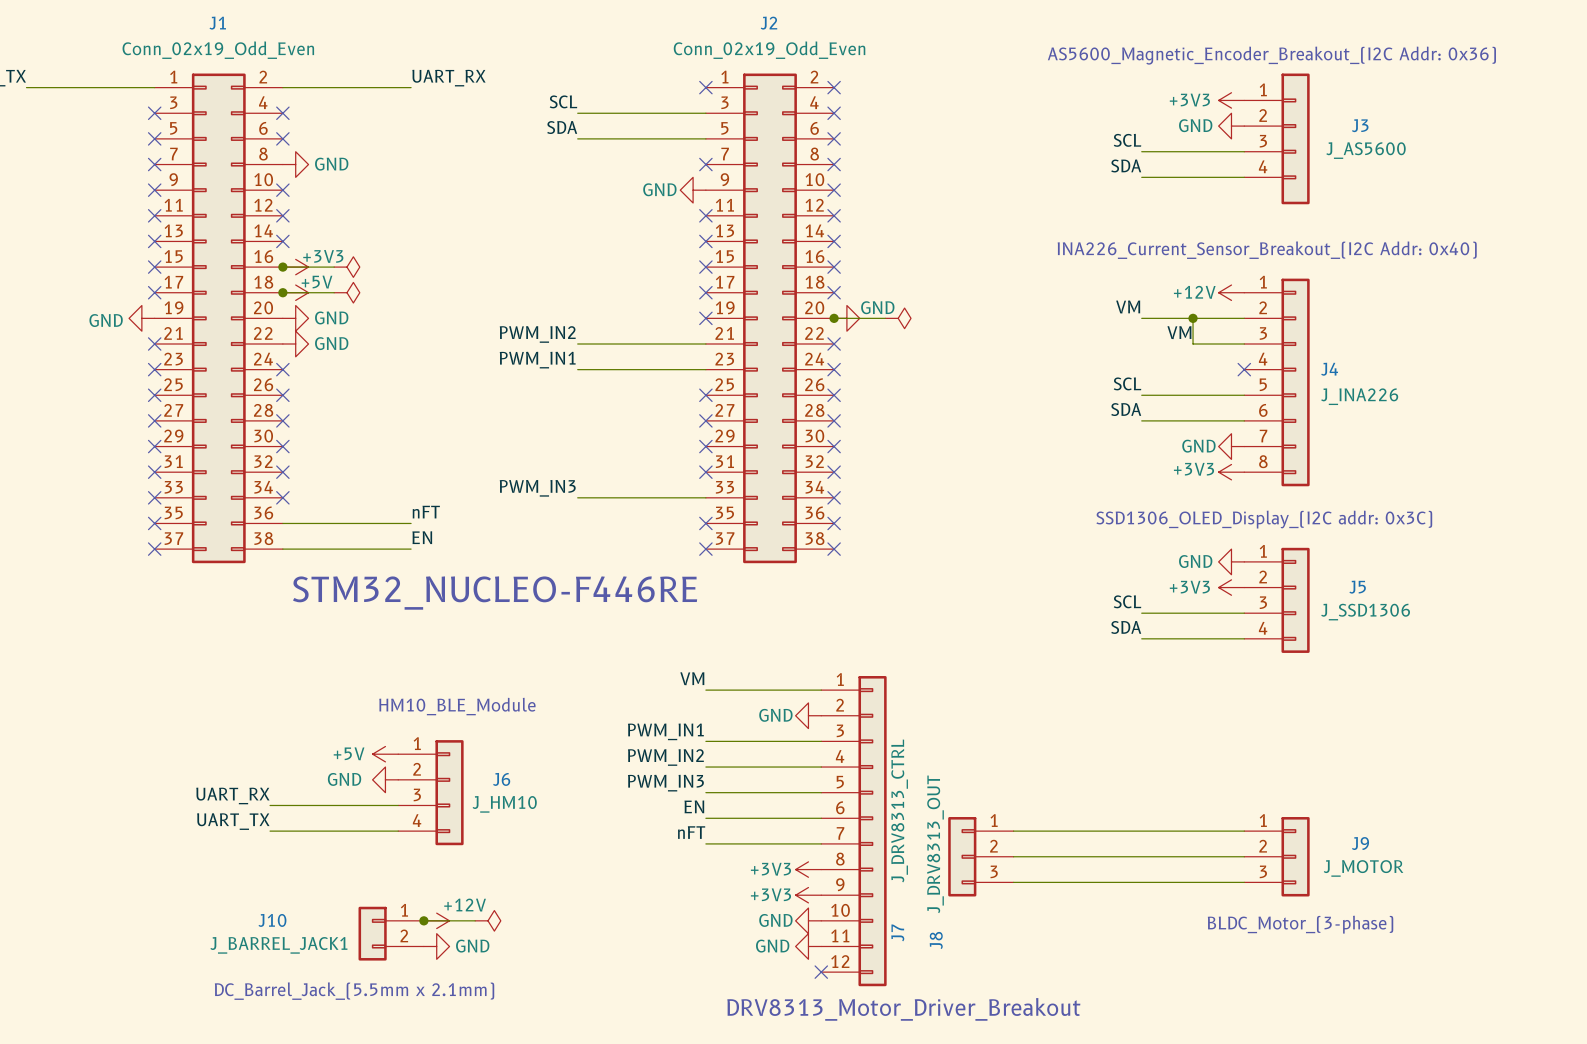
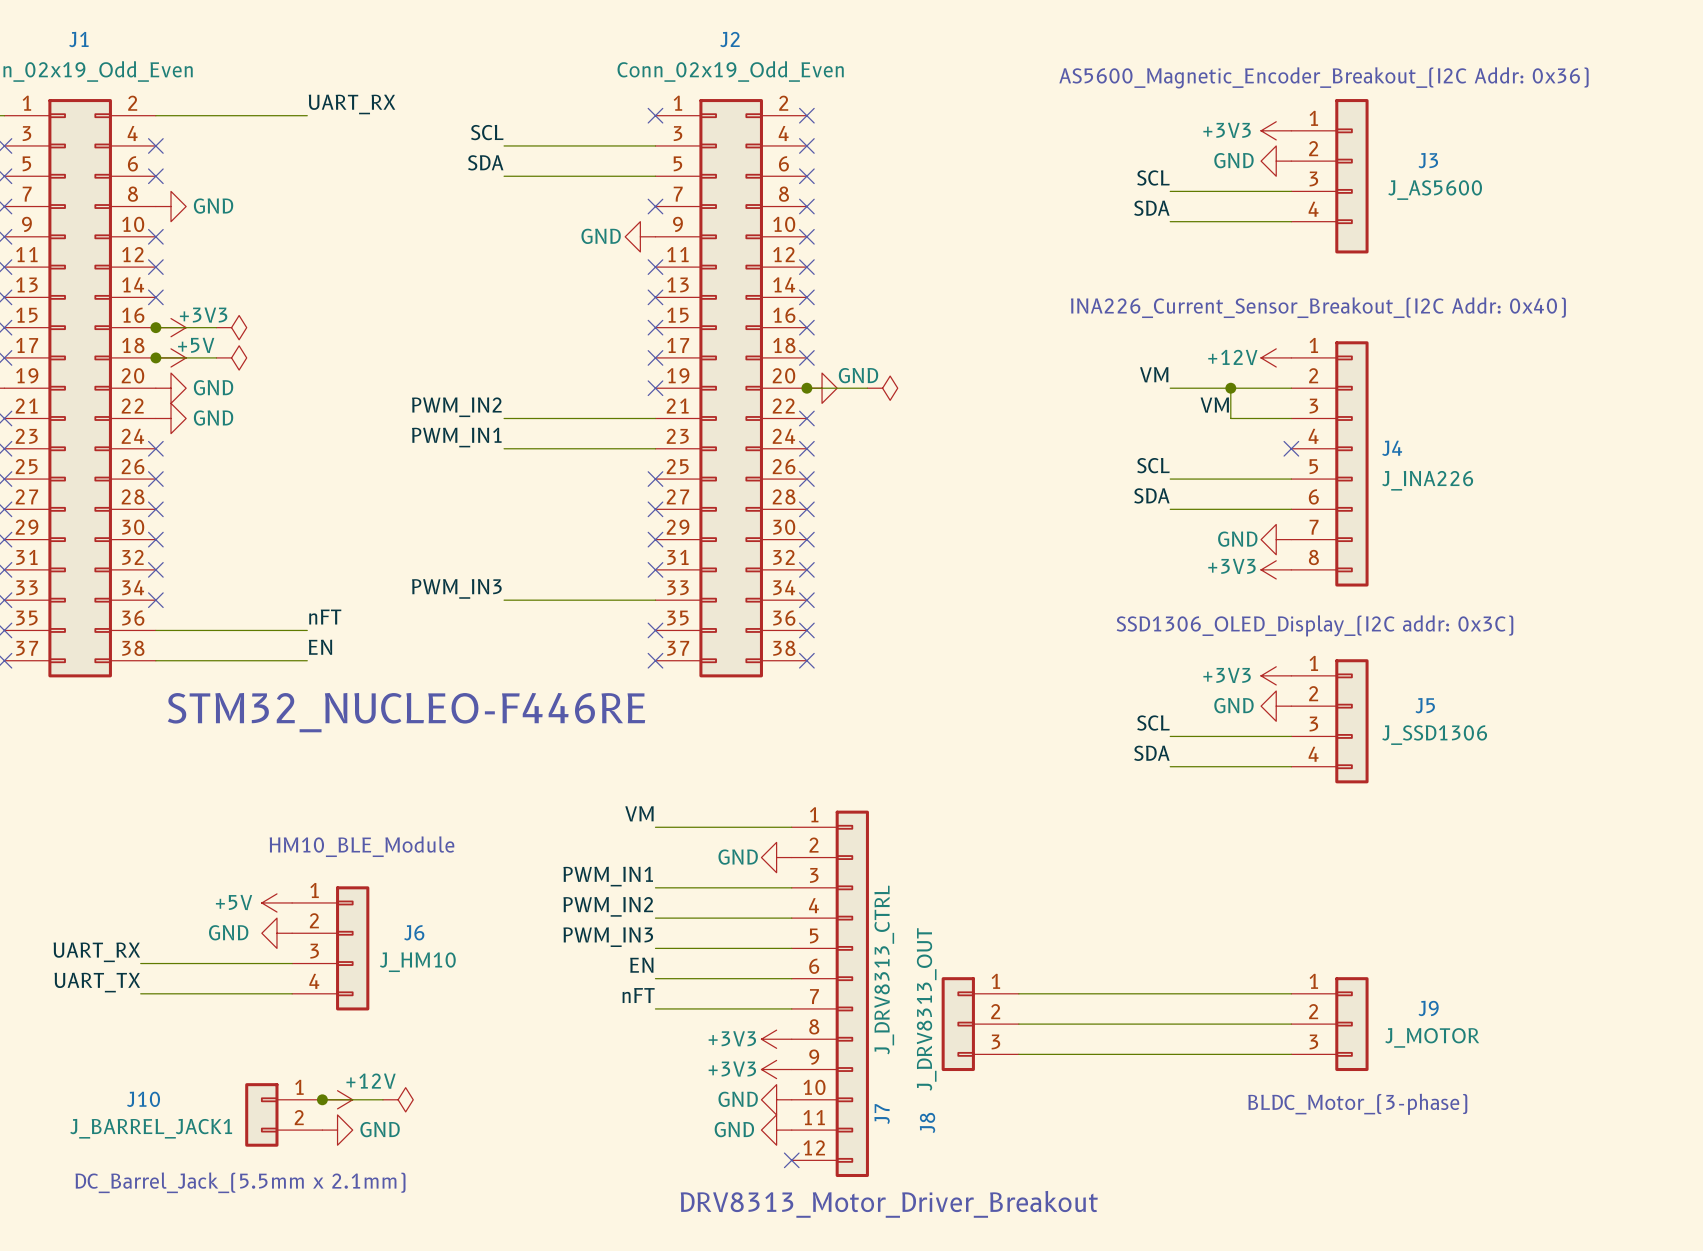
power symbol: GND (1231, 561) -> +3V3 (1276, 675)
power symbol: +3V3 (1231, 587) -> GND (1276, 706)

